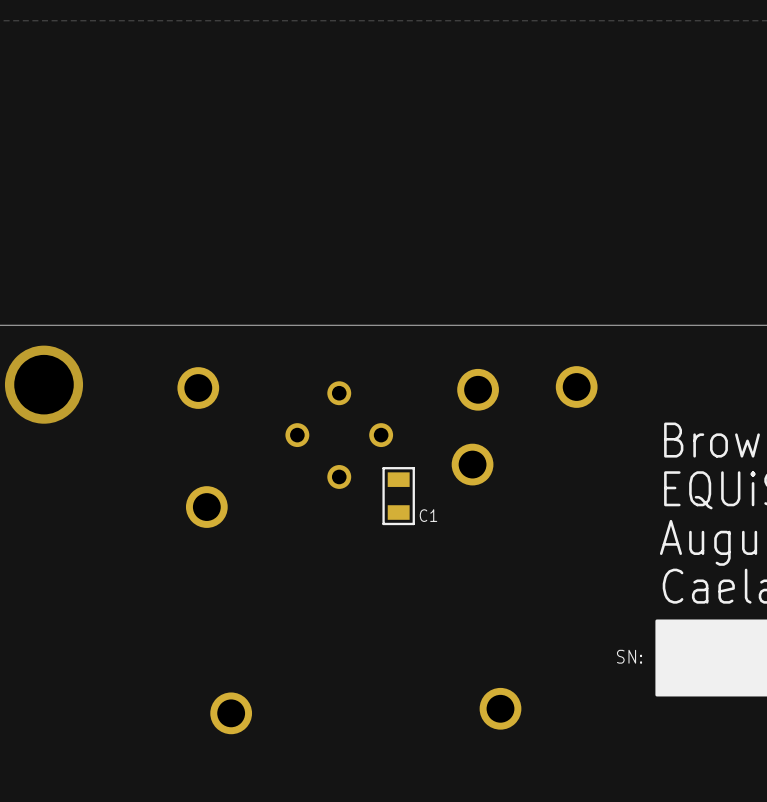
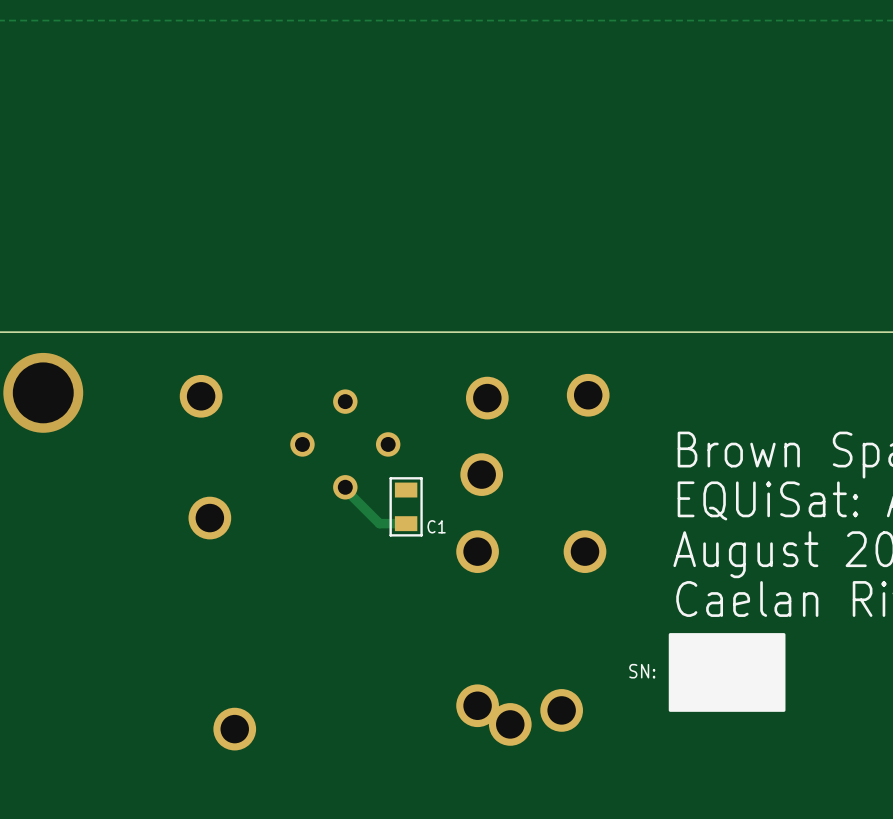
track: none -> (345, 487) (379, 523) (406, 523)
part: none -> (477, 551)
part: none -> (584, 551)
part: none -> (477, 705)
part: none -> (561, 710)

